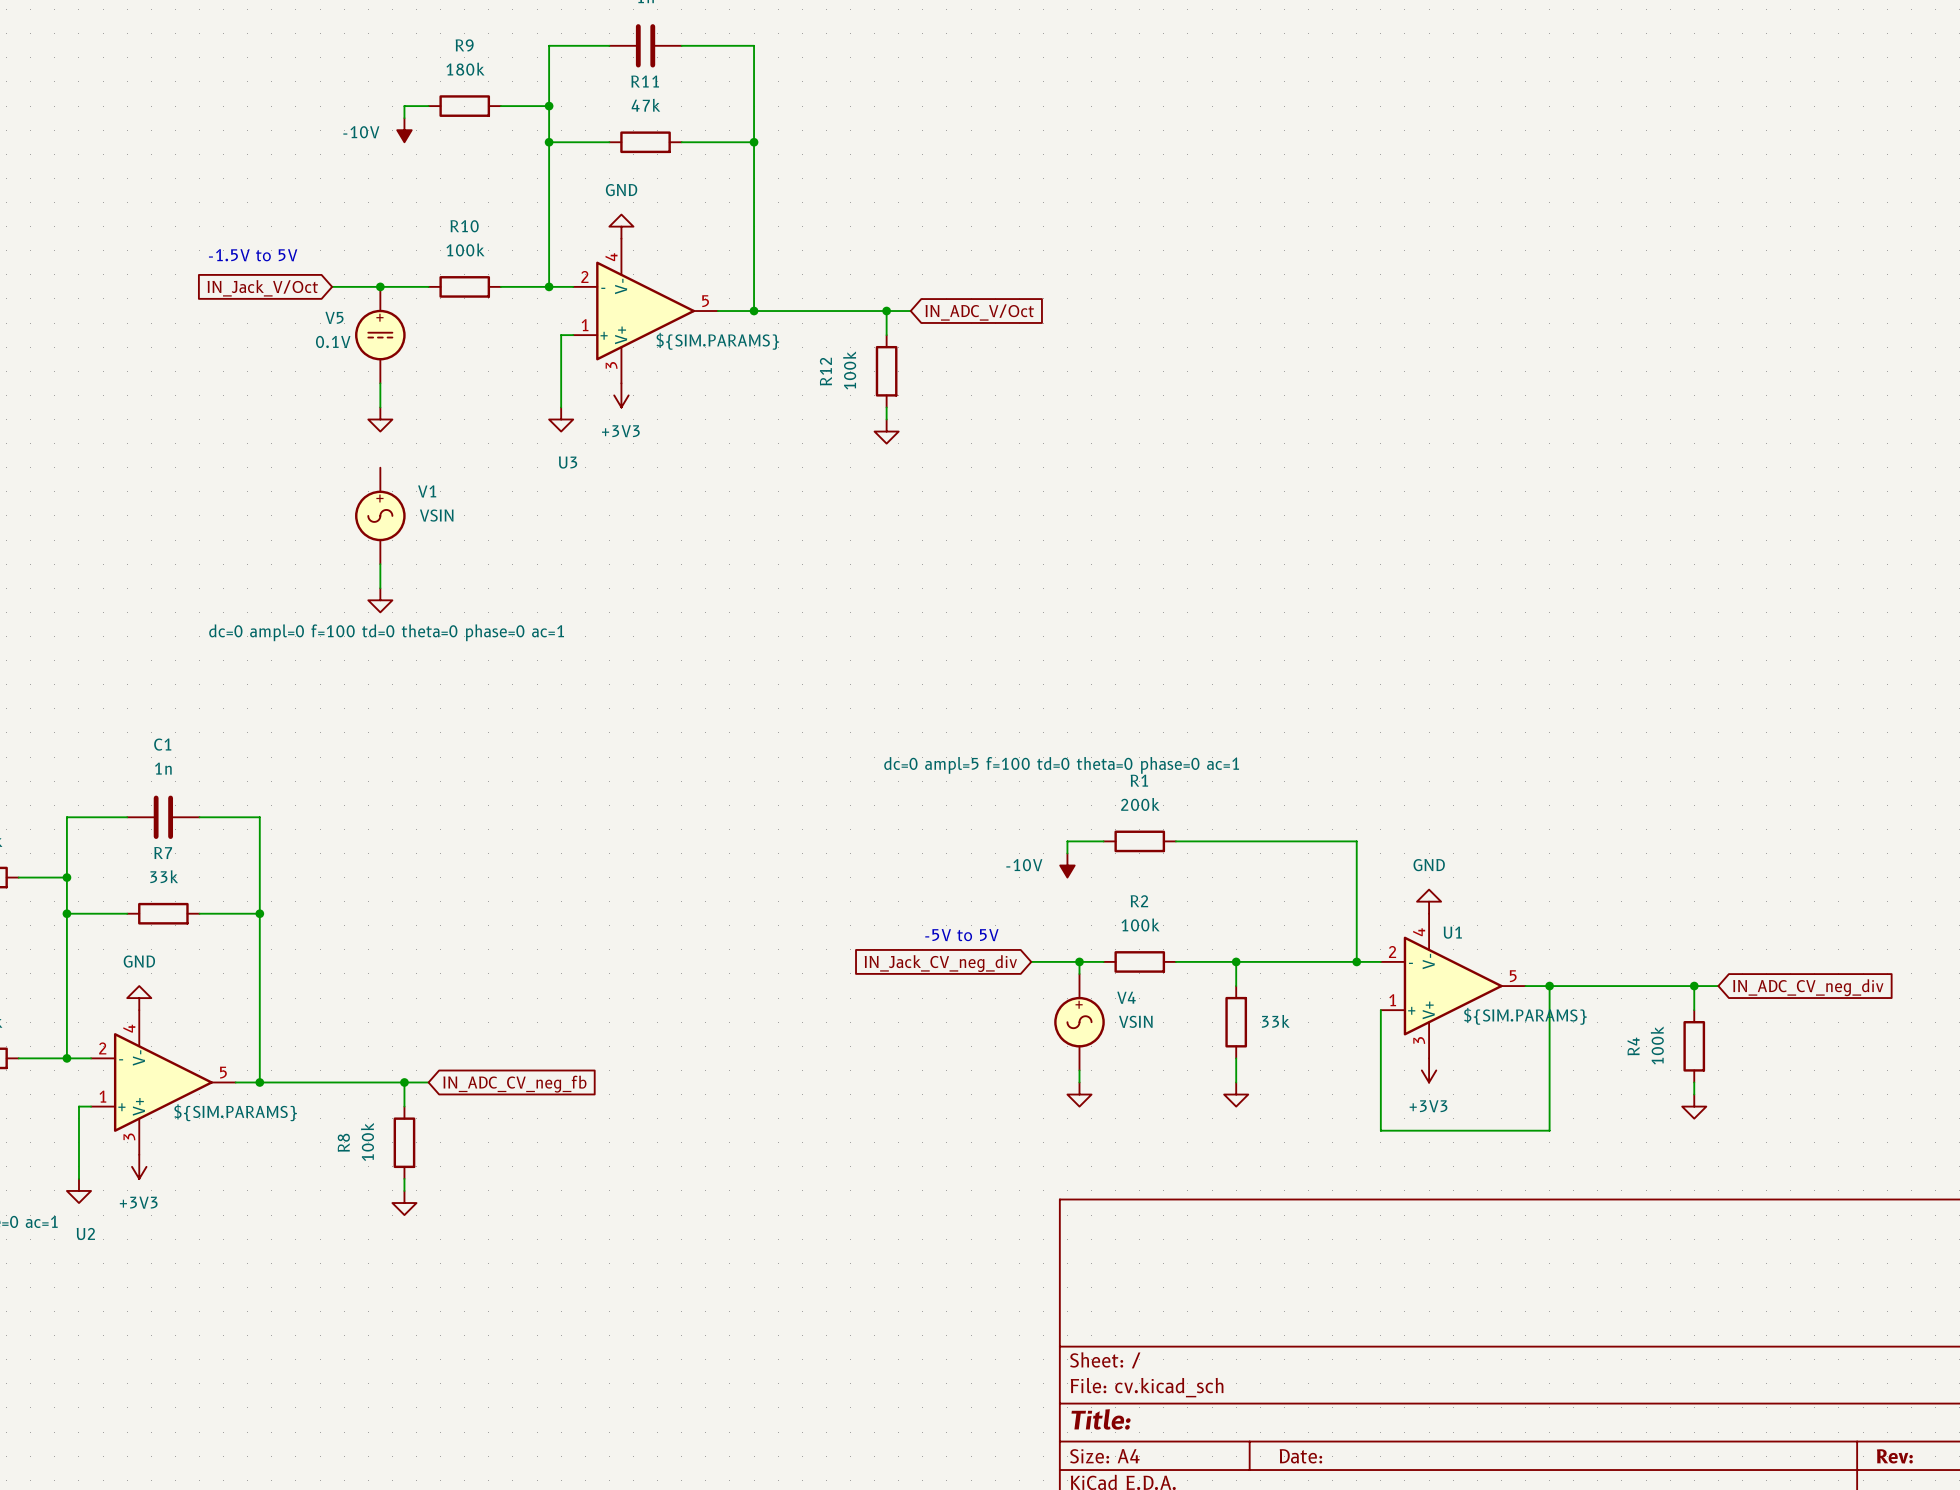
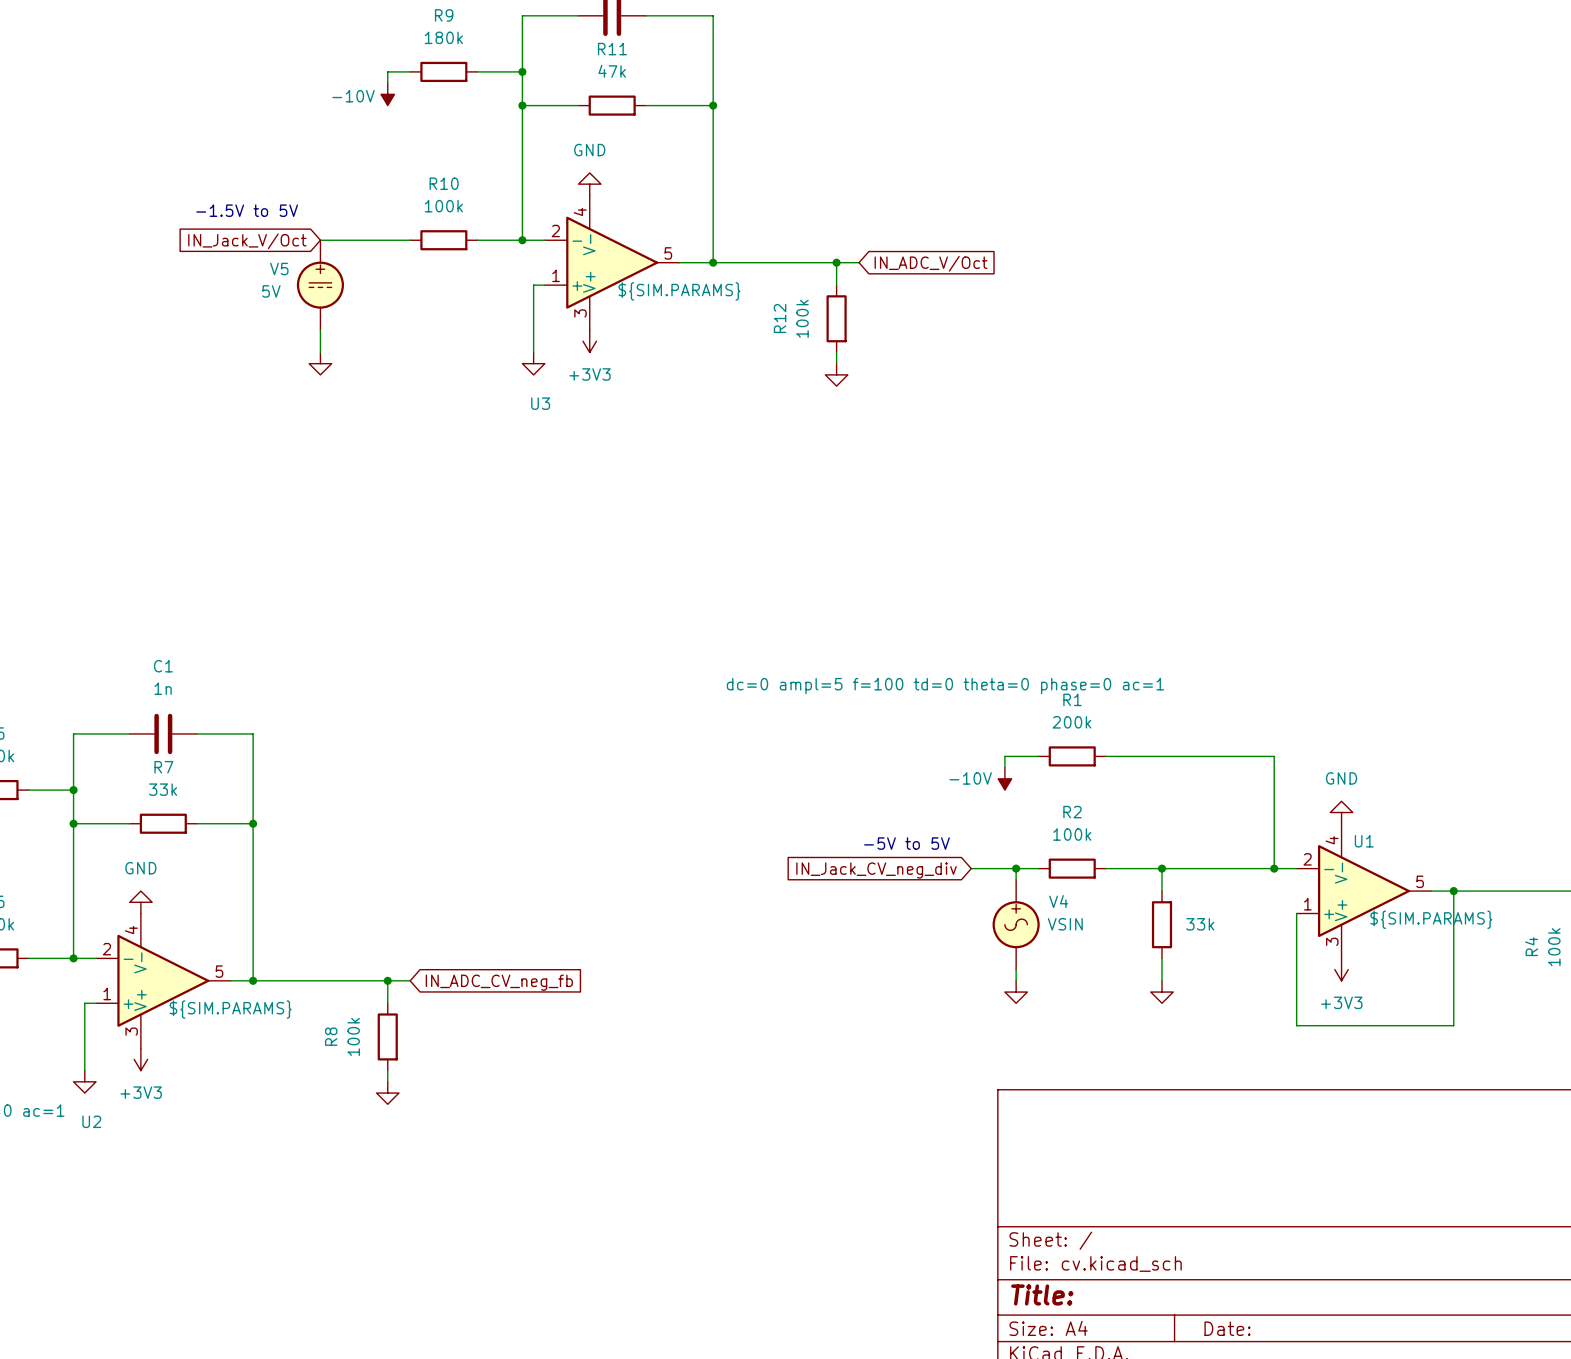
junction: (380, 286) -> none
V5 position: (380, 335) -> (320, 285)
V5 value: 0.1V (333, 341) -> 5V (271, 291)
wire: (380, 383) (380, 407) -> (320, 330) (320, 352)
power symbol position: (380, 419) -> (320, 363)
V1: VSIN (380, 515) -> none
wire: (380, 564) (380, 588) -> none
power symbol: (380, 600) -> none

